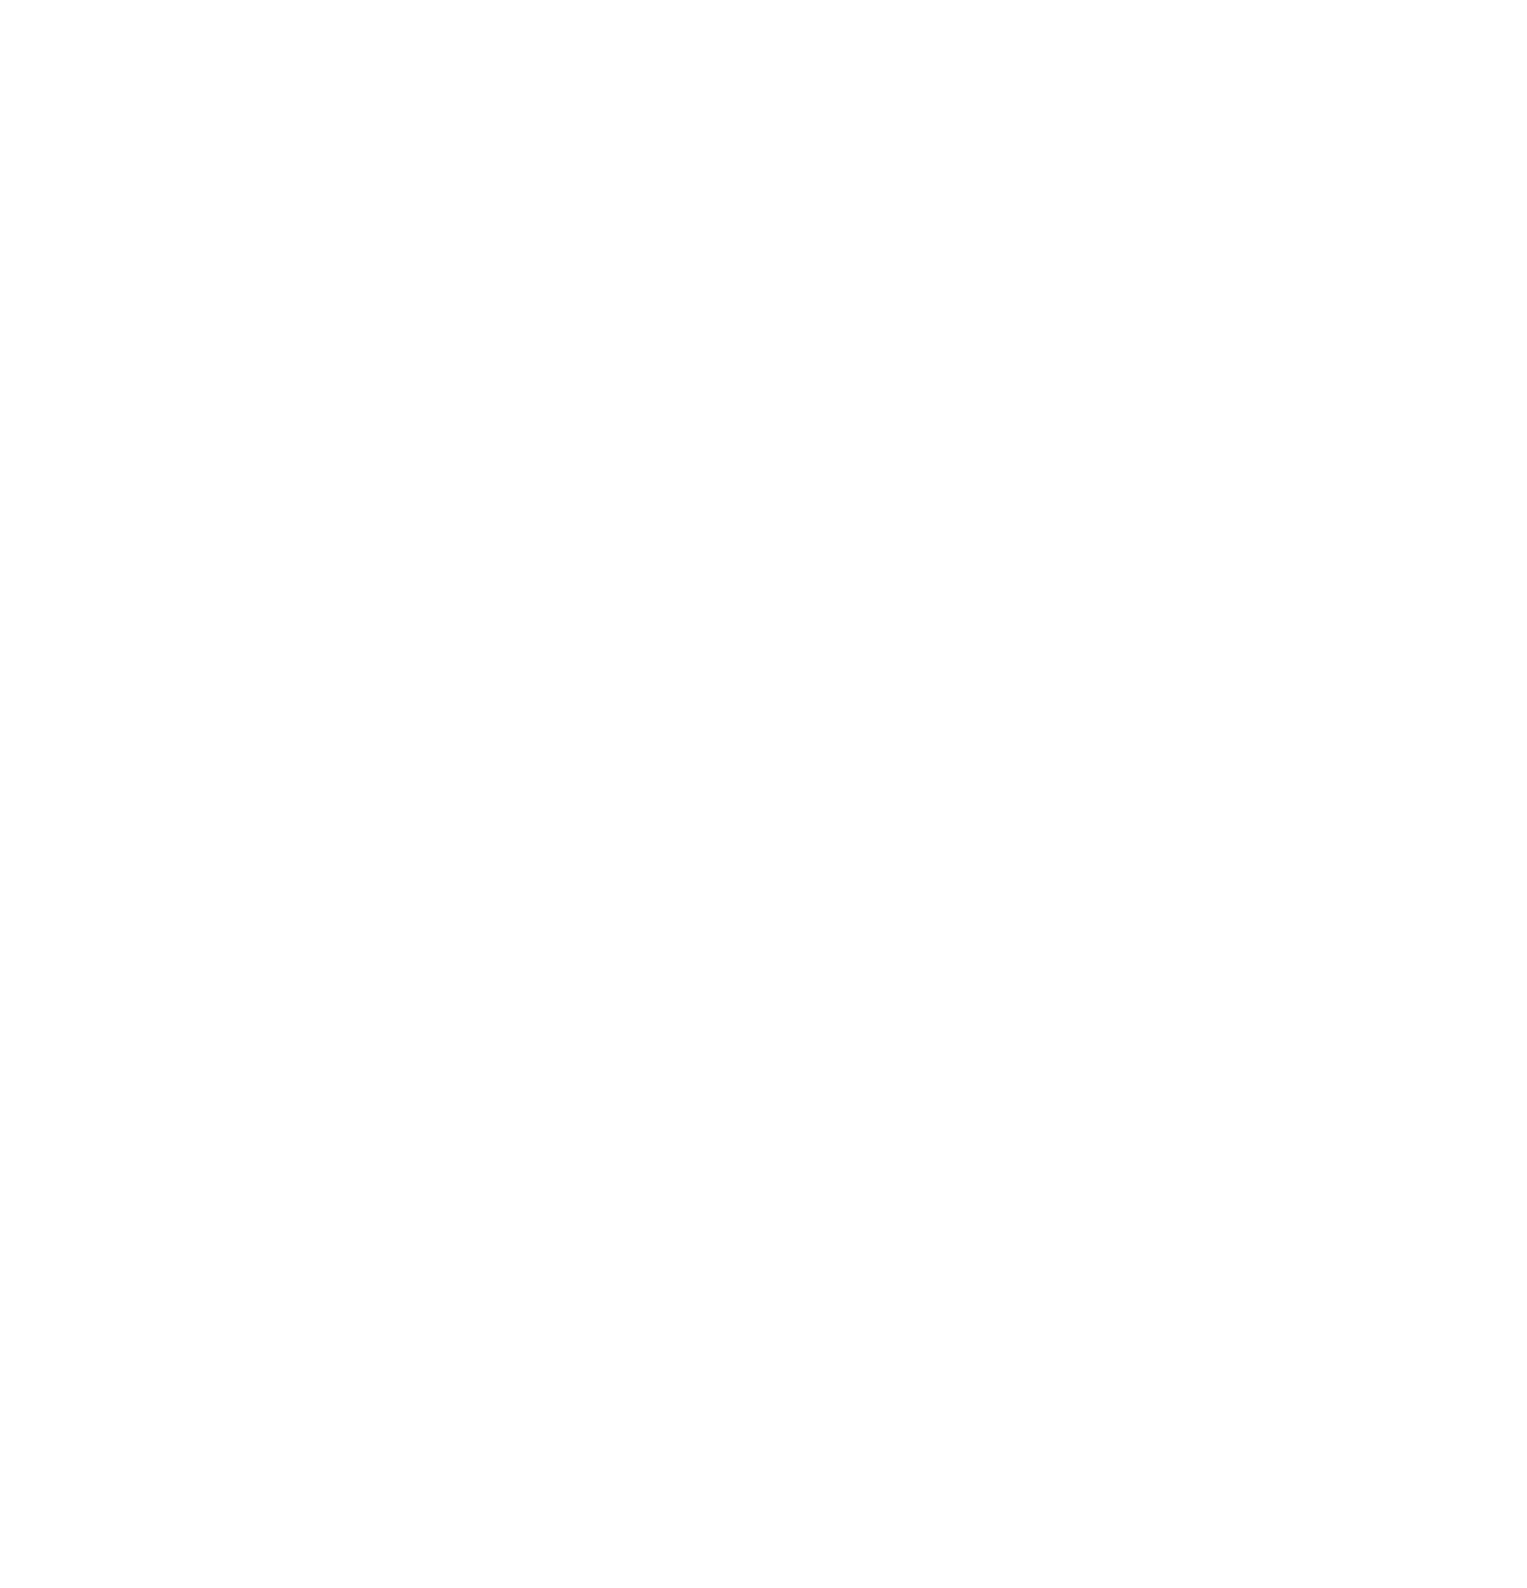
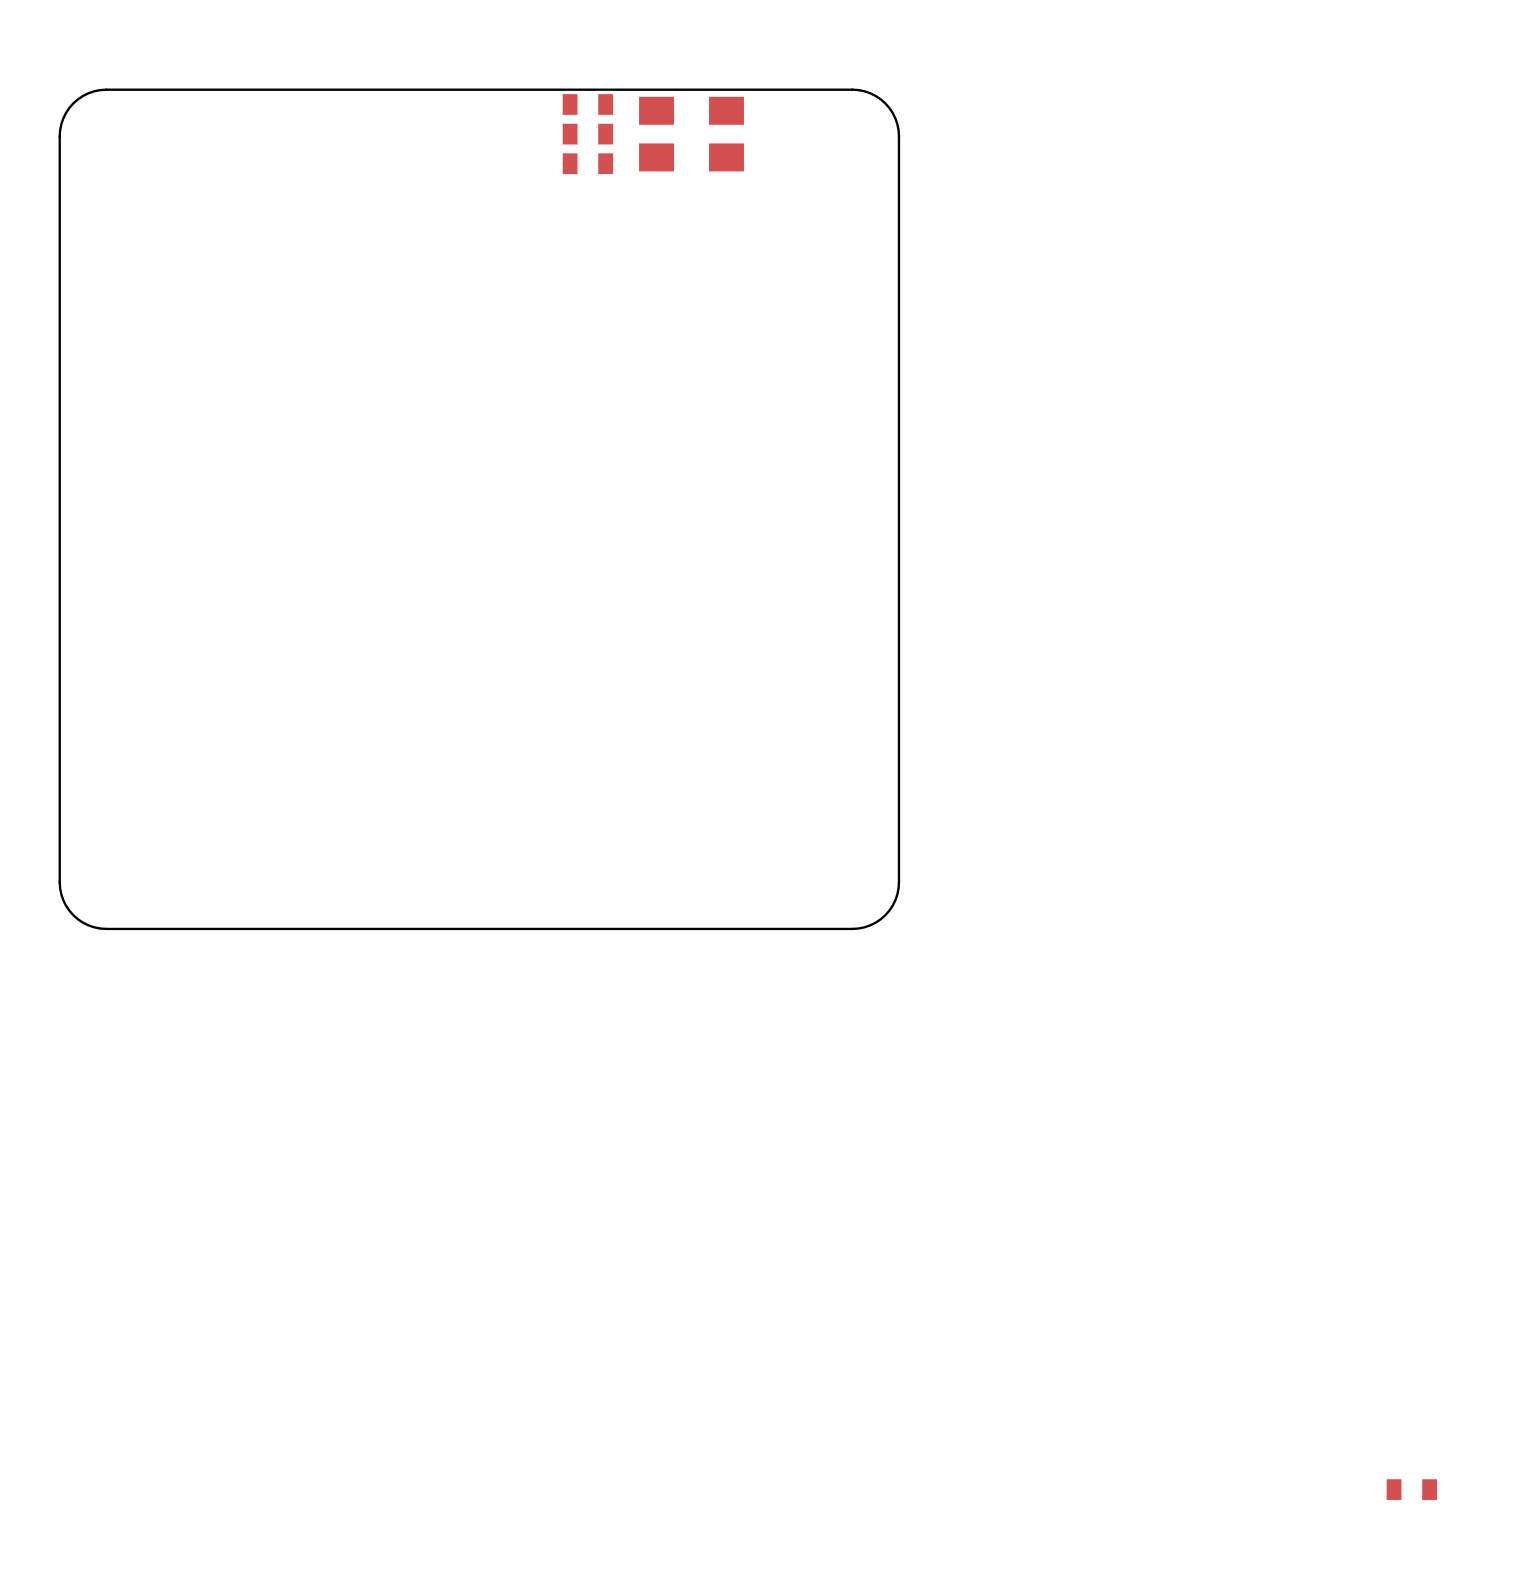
board edge: none -> (852, 89) (106, 89) (88, 93) (73, 103) (63, 118) (59, 136) (59, 882) (63, 900) (73, 915) (88, 925) (106, 928) (852, 928) (870, 925) (885, 915) (895, 900) (898, 882) (898, 136) (895, 118) (885, 103) (870, 93) (852, 89)
part: none -> (587, 104)
part: none -> (587, 134)
part: none -> (691, 134)
part: none -> (587, 163)
part: none -> (1411, 1489)

